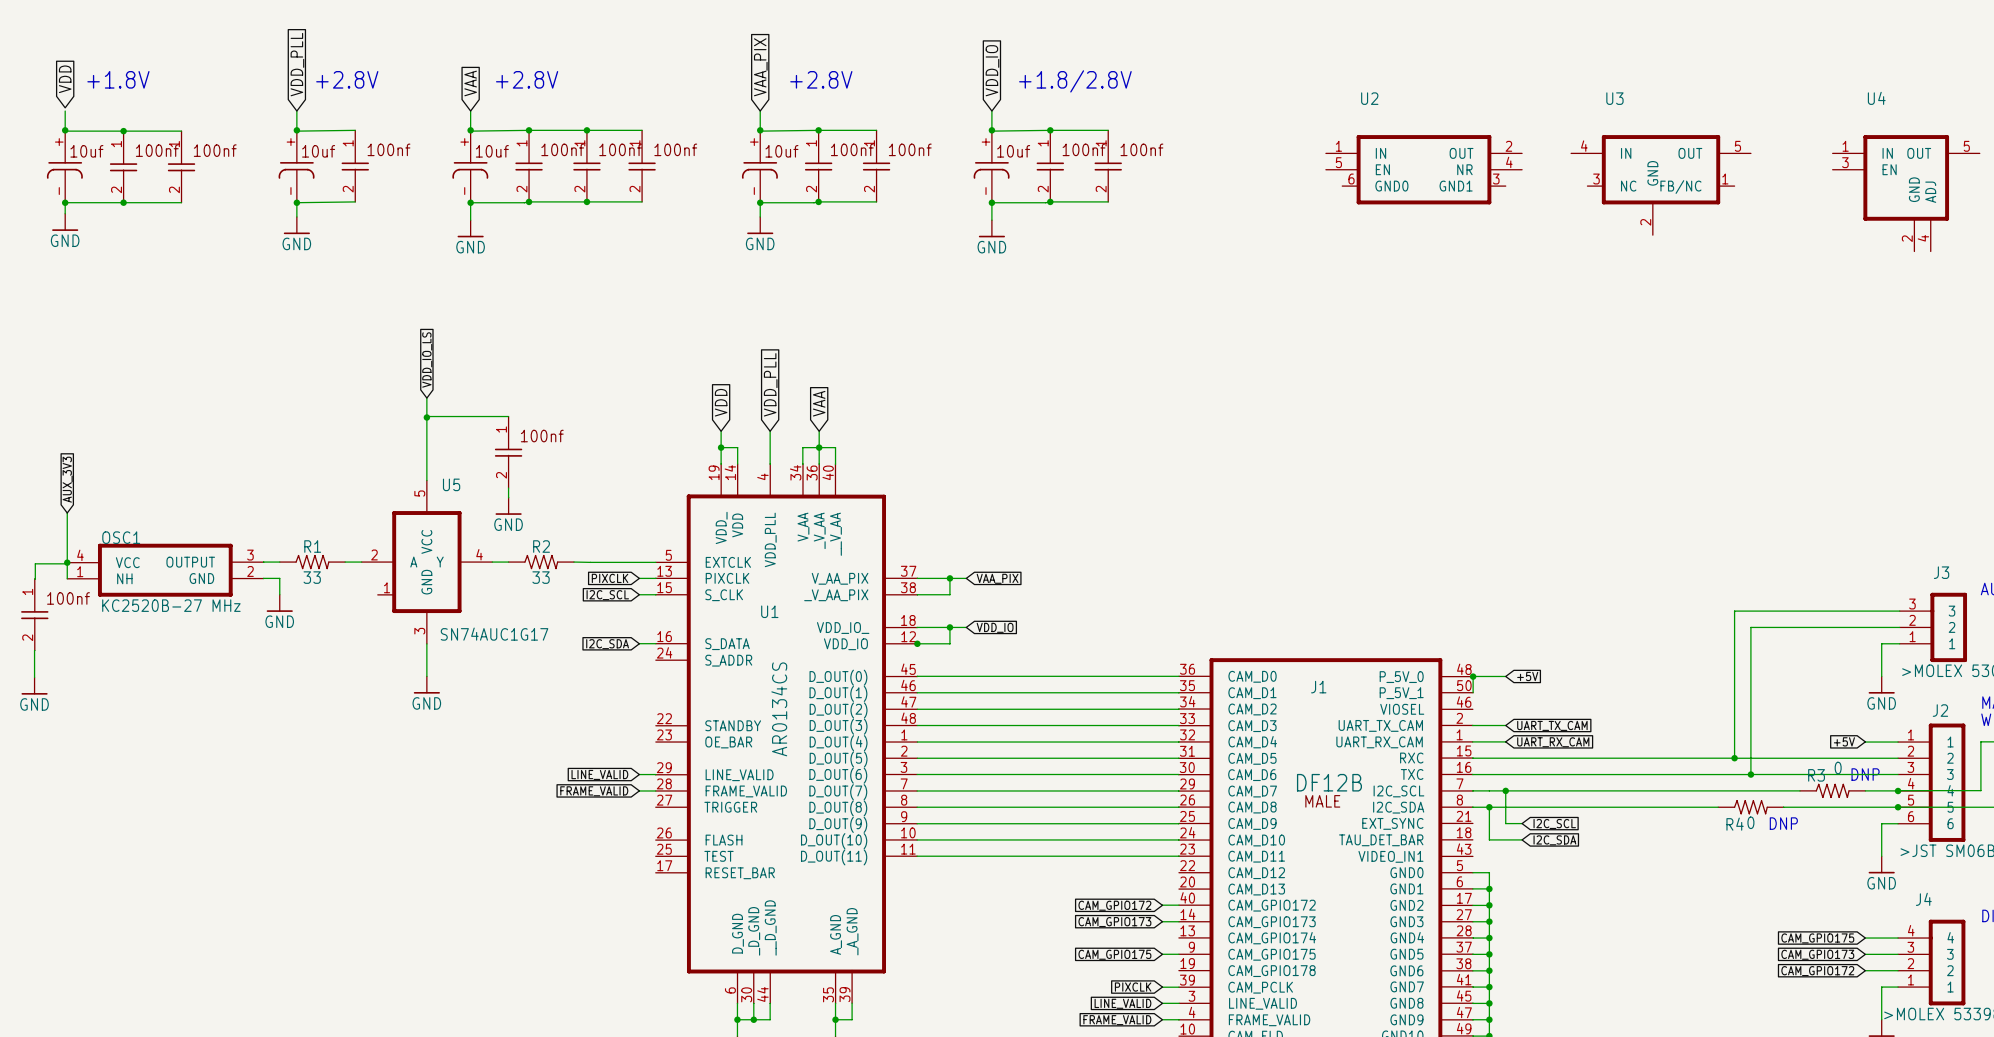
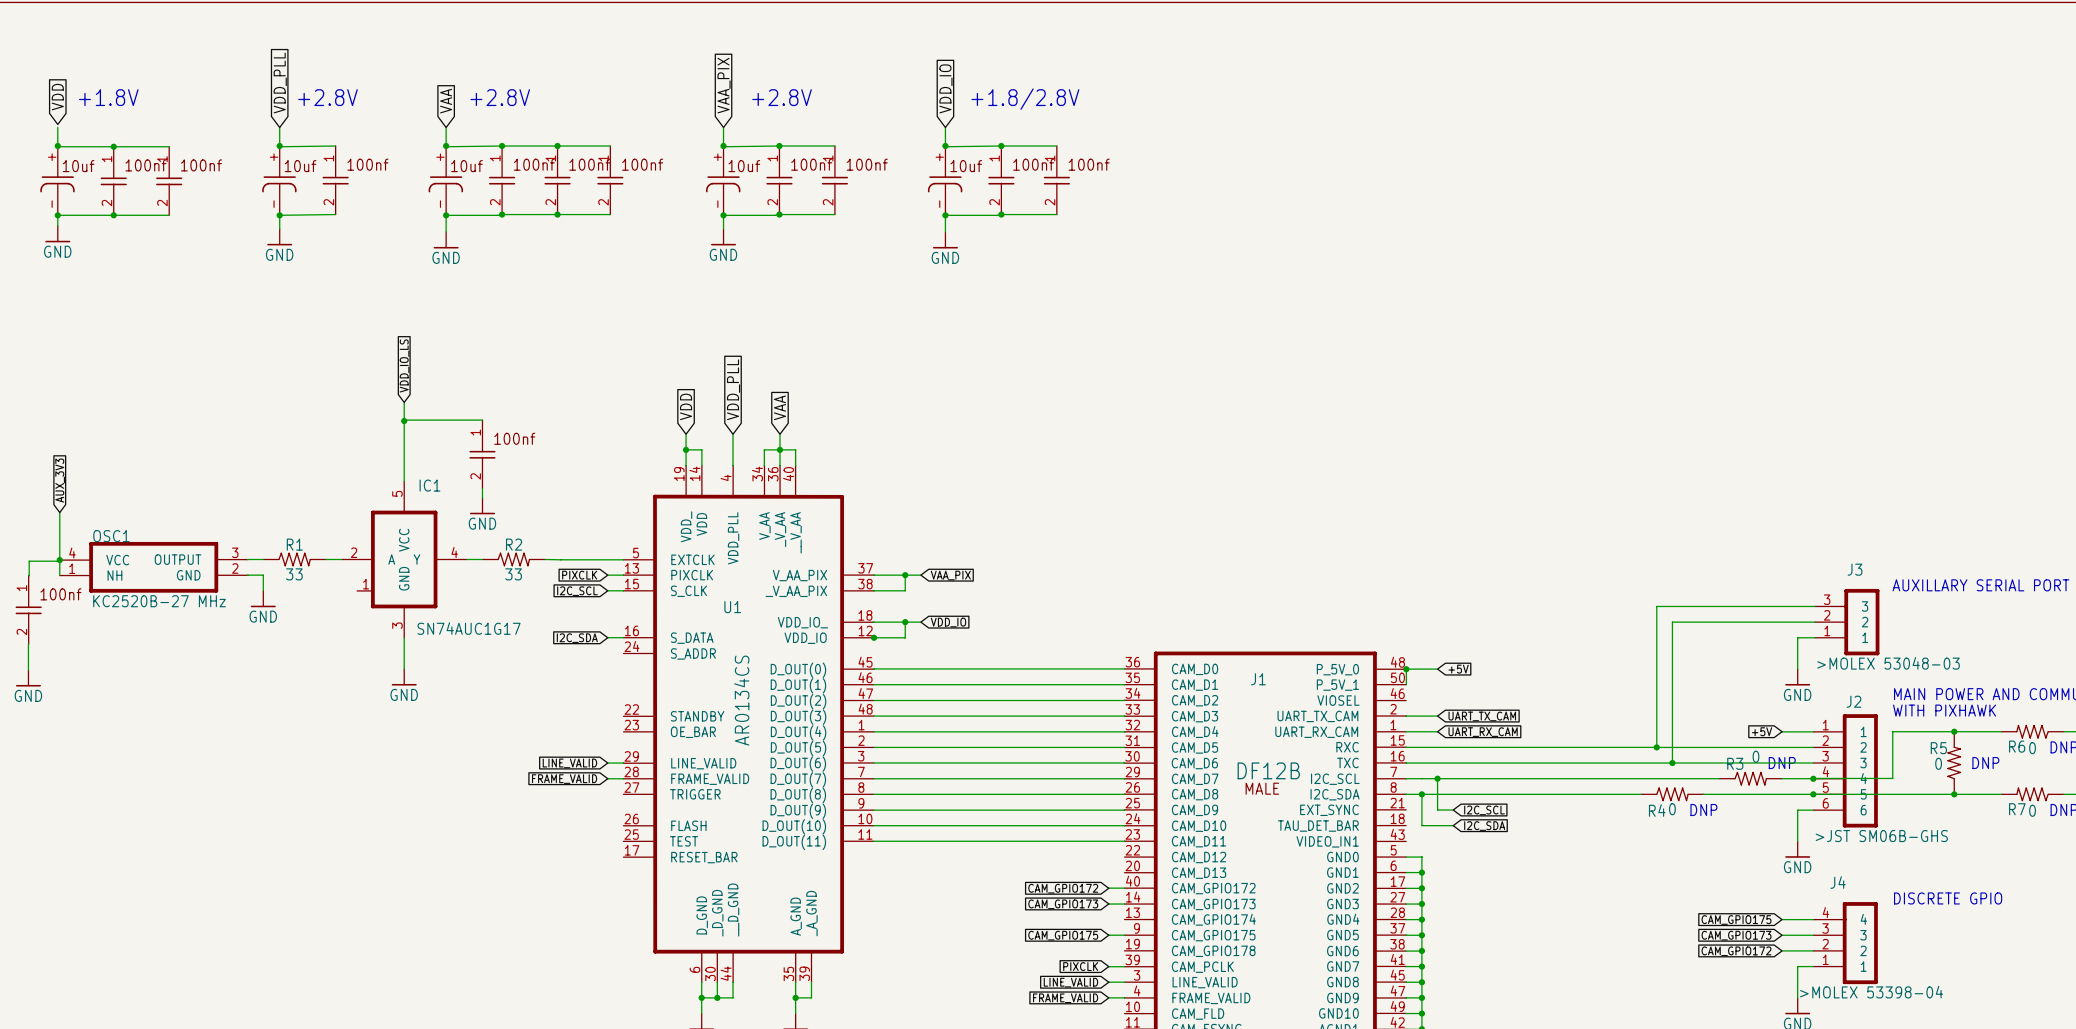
U2: (1424, 169) -> none
U3: (1661, 185) -> none
U4: (1906, 193) -> none
U5 name: U5 (451, 484) -> IC1 (430, 485)

